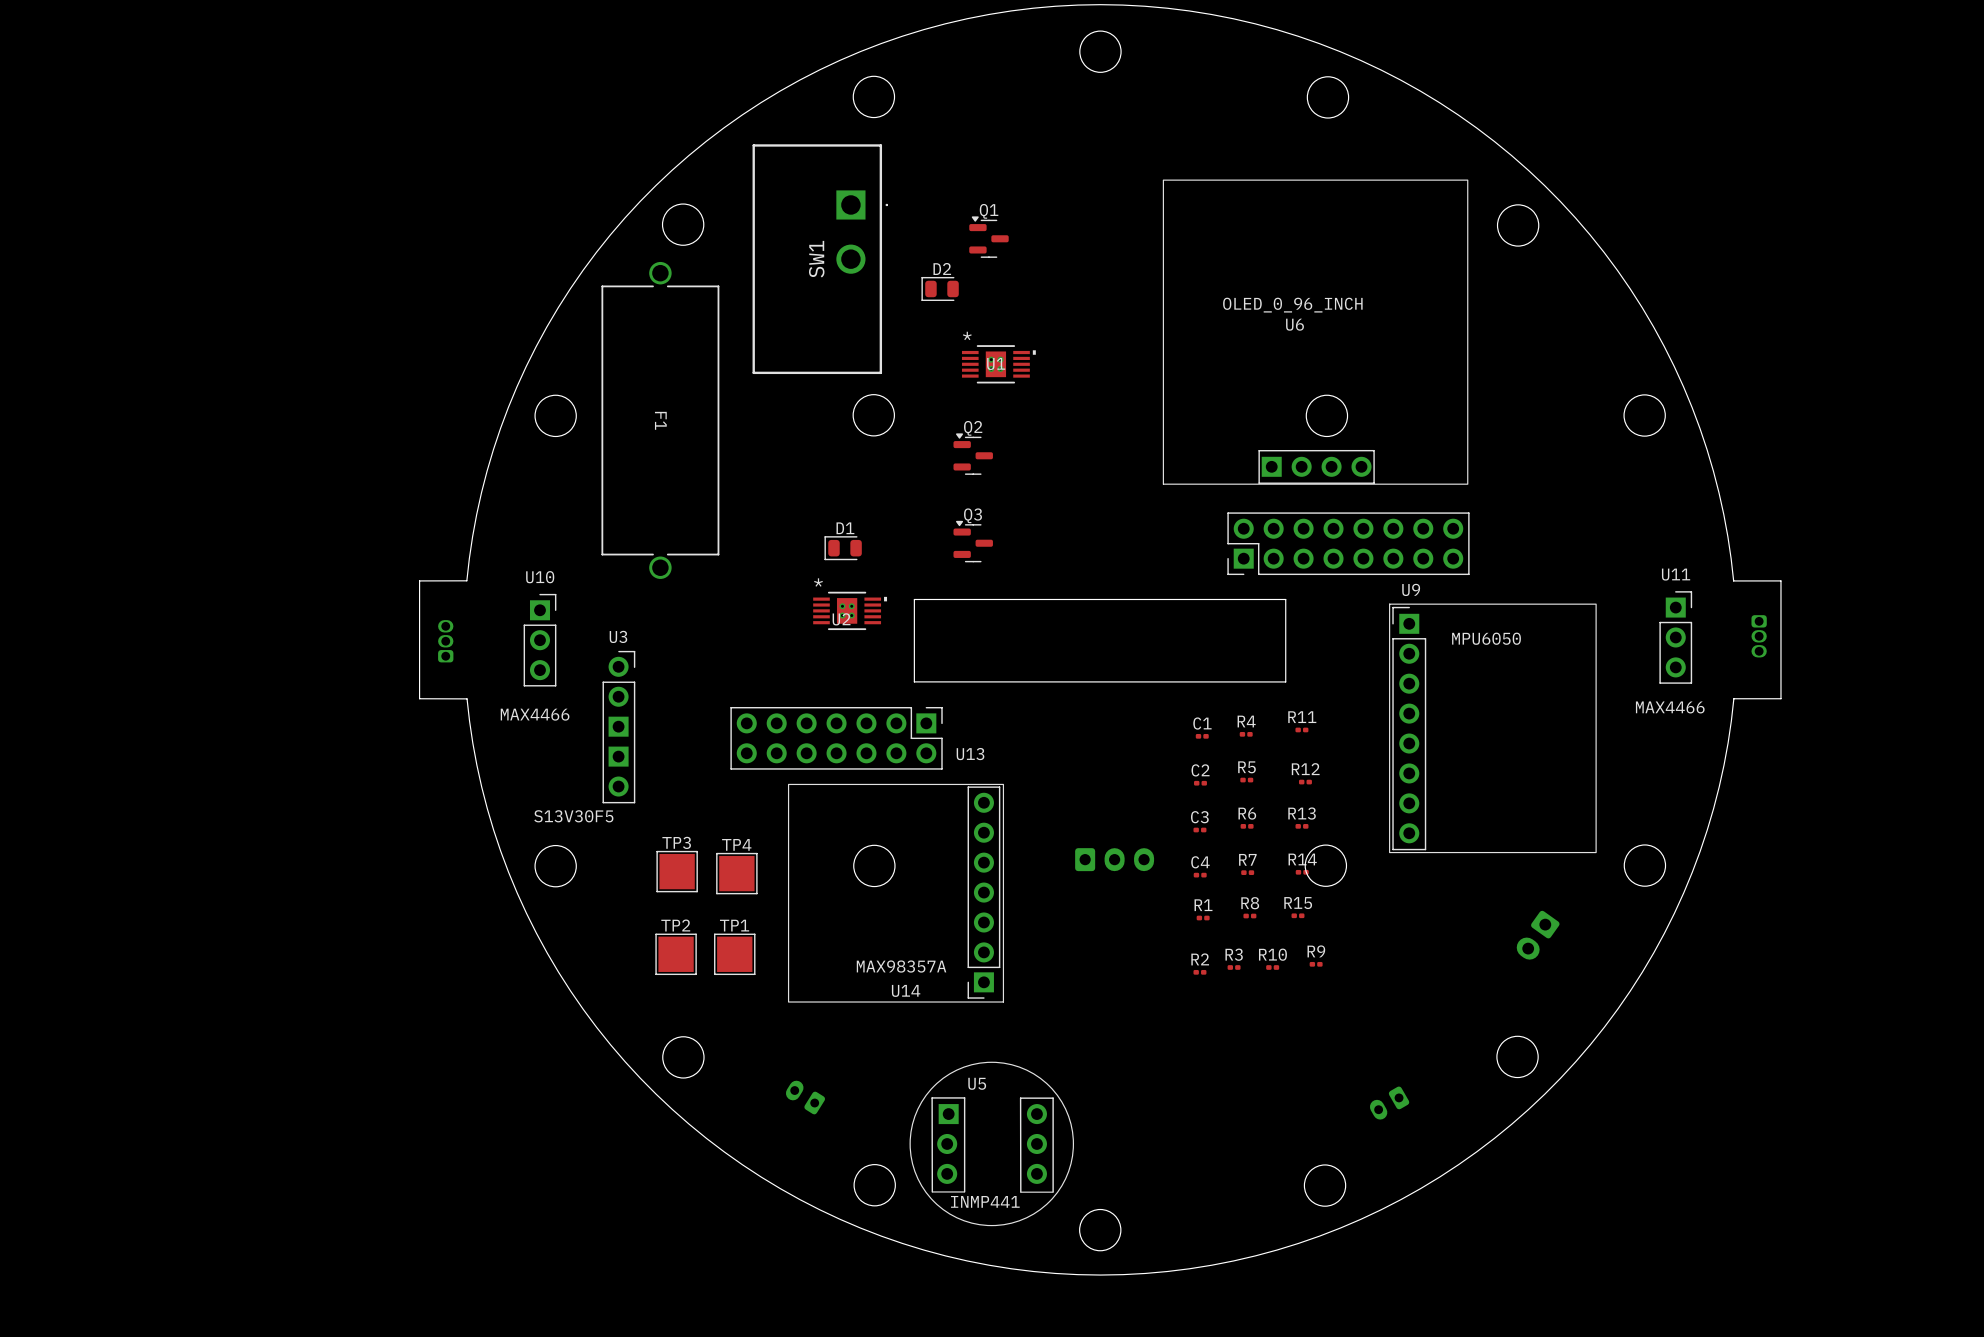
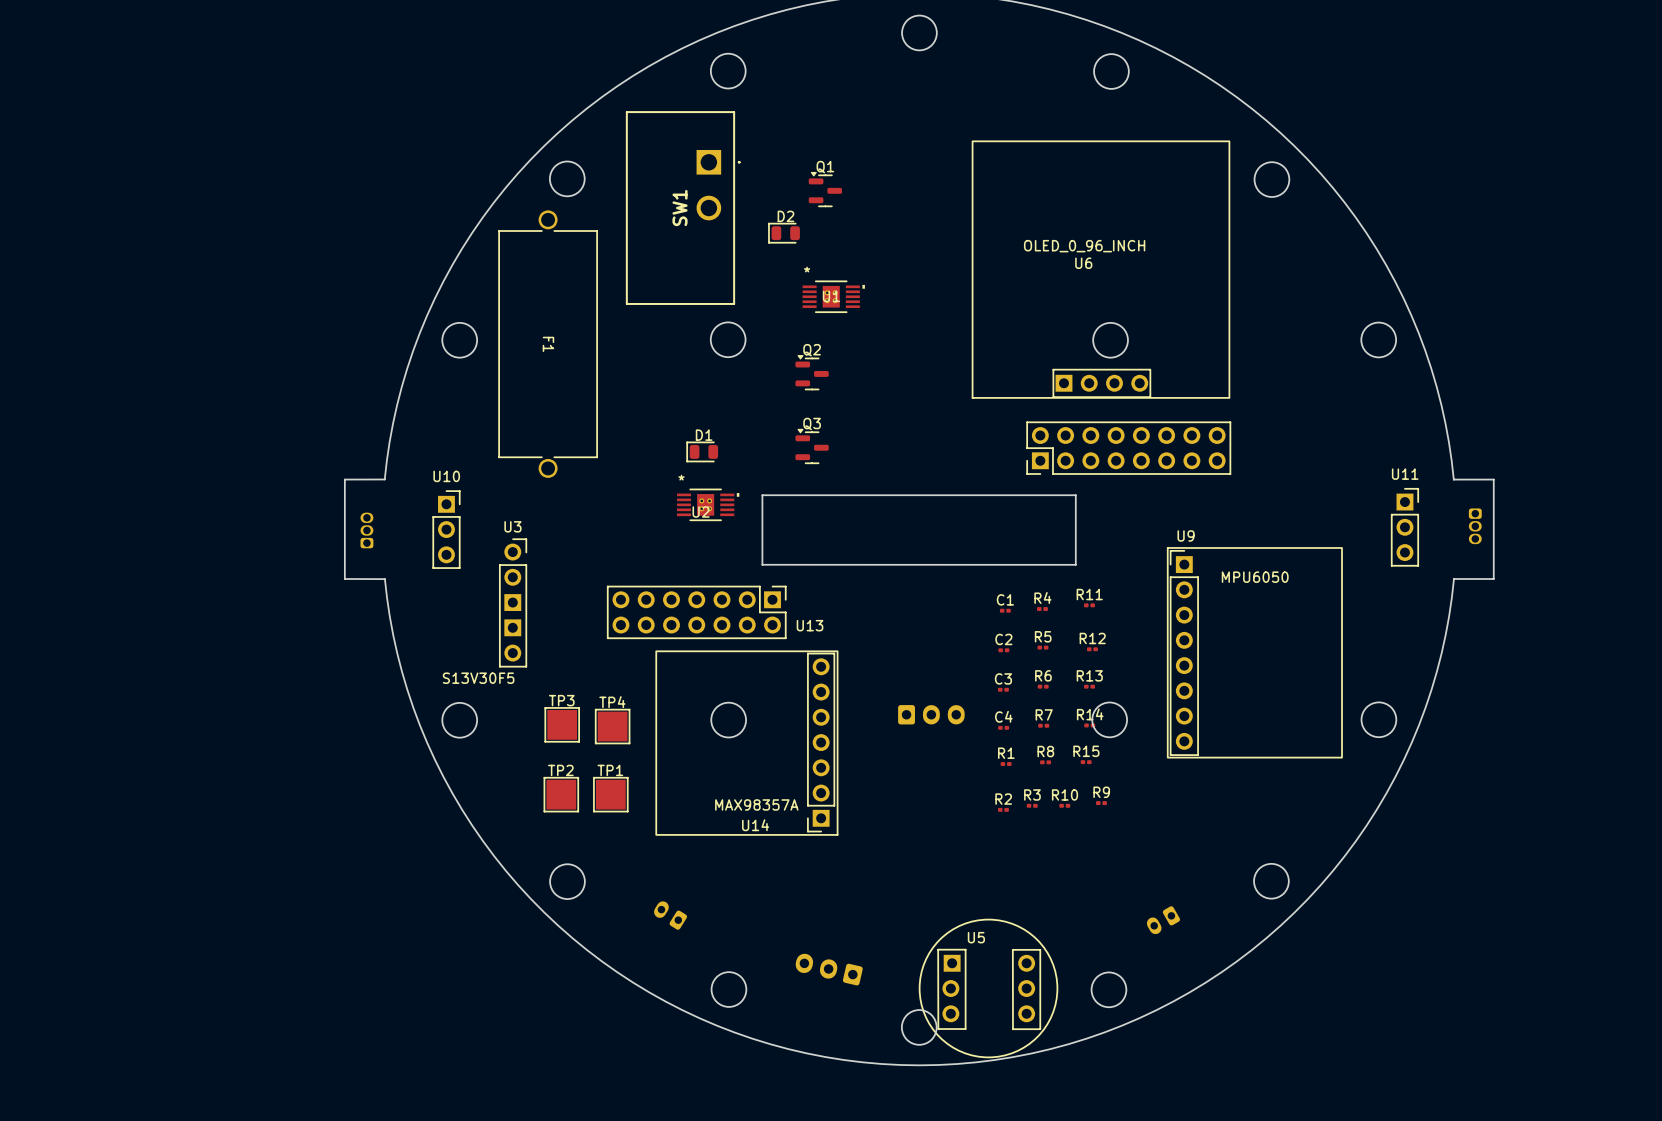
U11 text: MAX4466 (1670, 707) -> none
U10 text: MAX4466 (535, 714) -> none
U9 position: (1492, 728) -> (1254, 652)
part: (1538, 935) -> none
U5 position: (991, 1143) -> (988, 988)
part: none -> (829, 969)
U5 text: INMP441 (985, 1201) -> none

